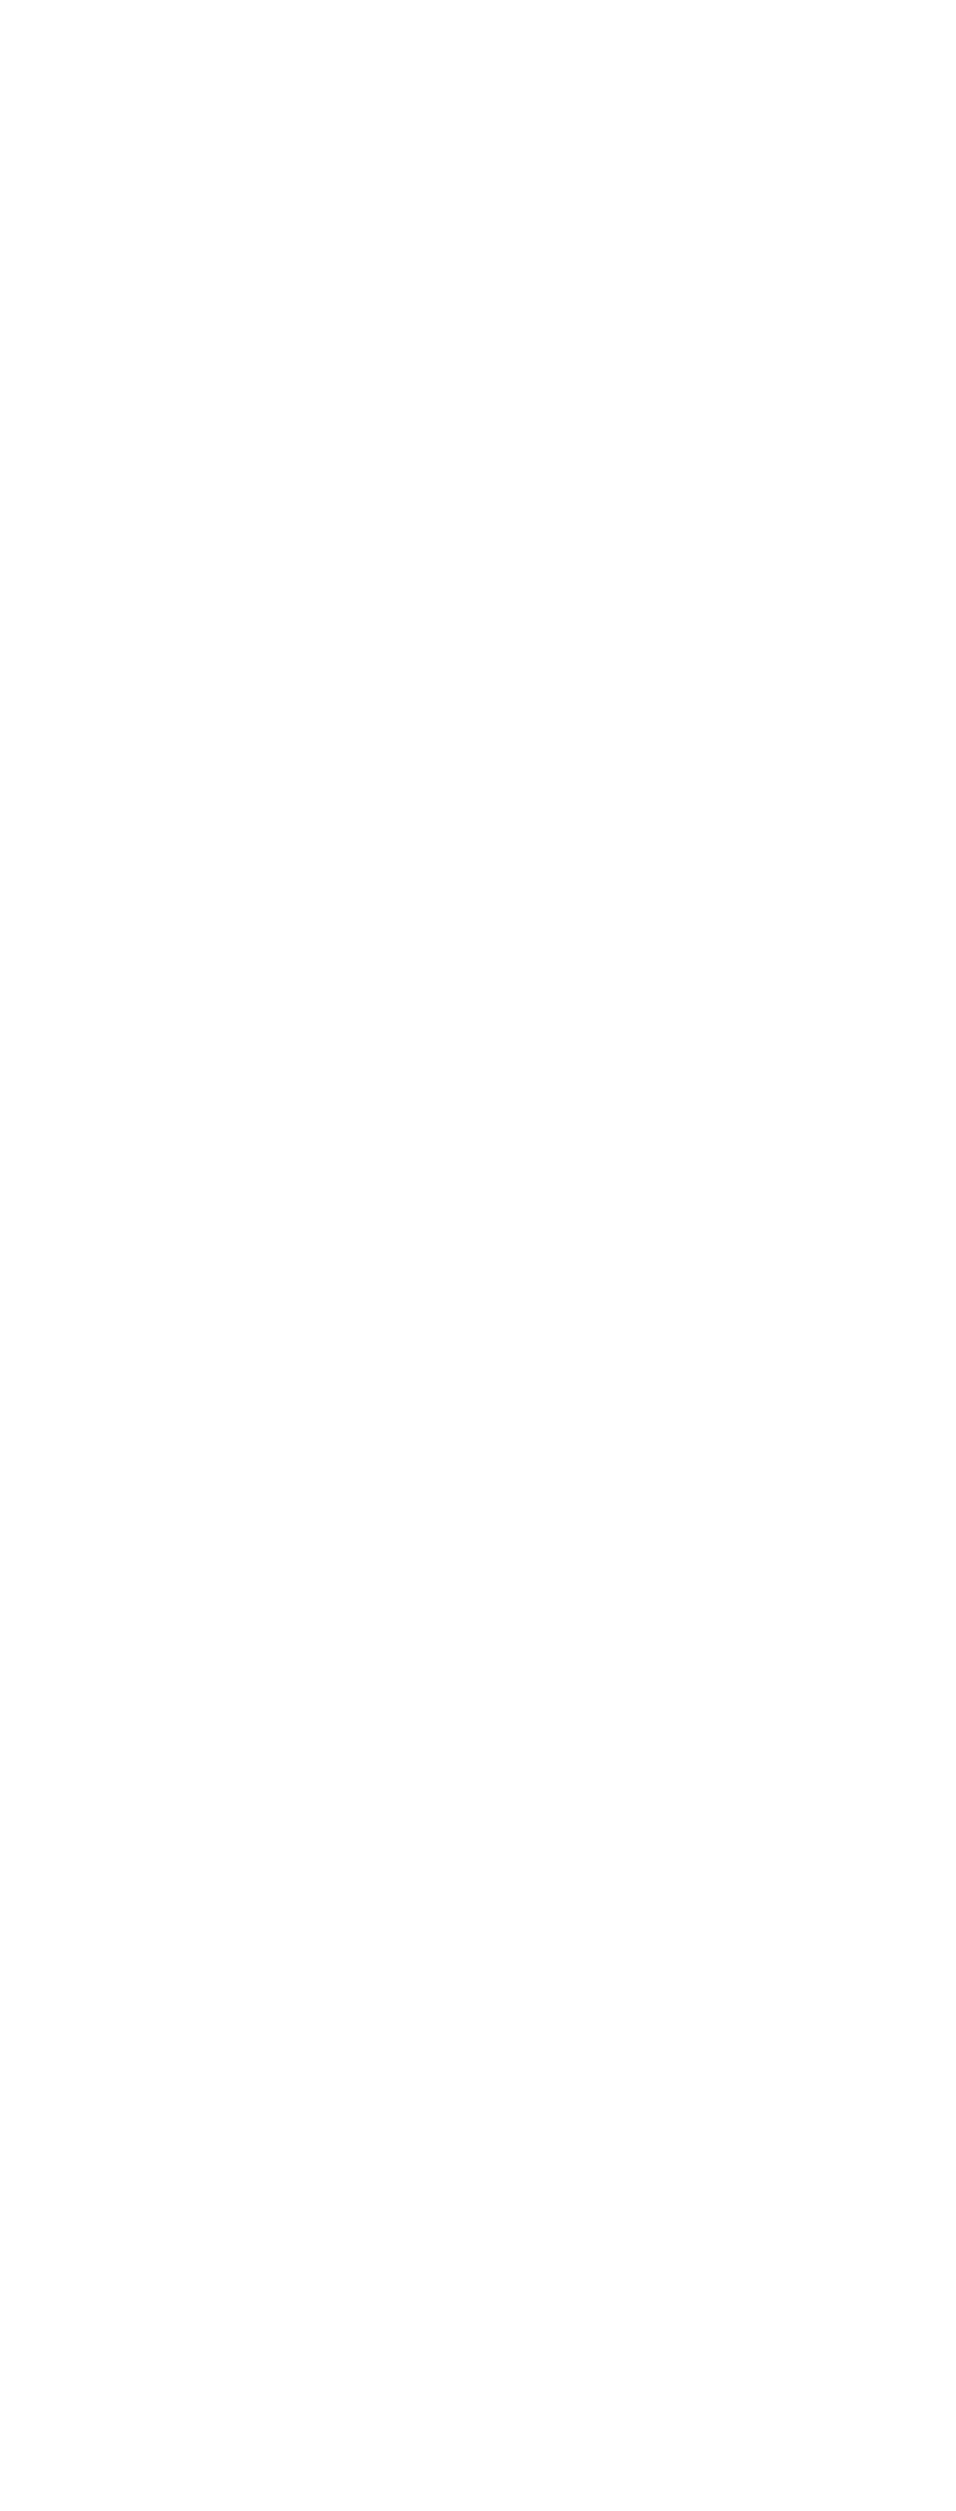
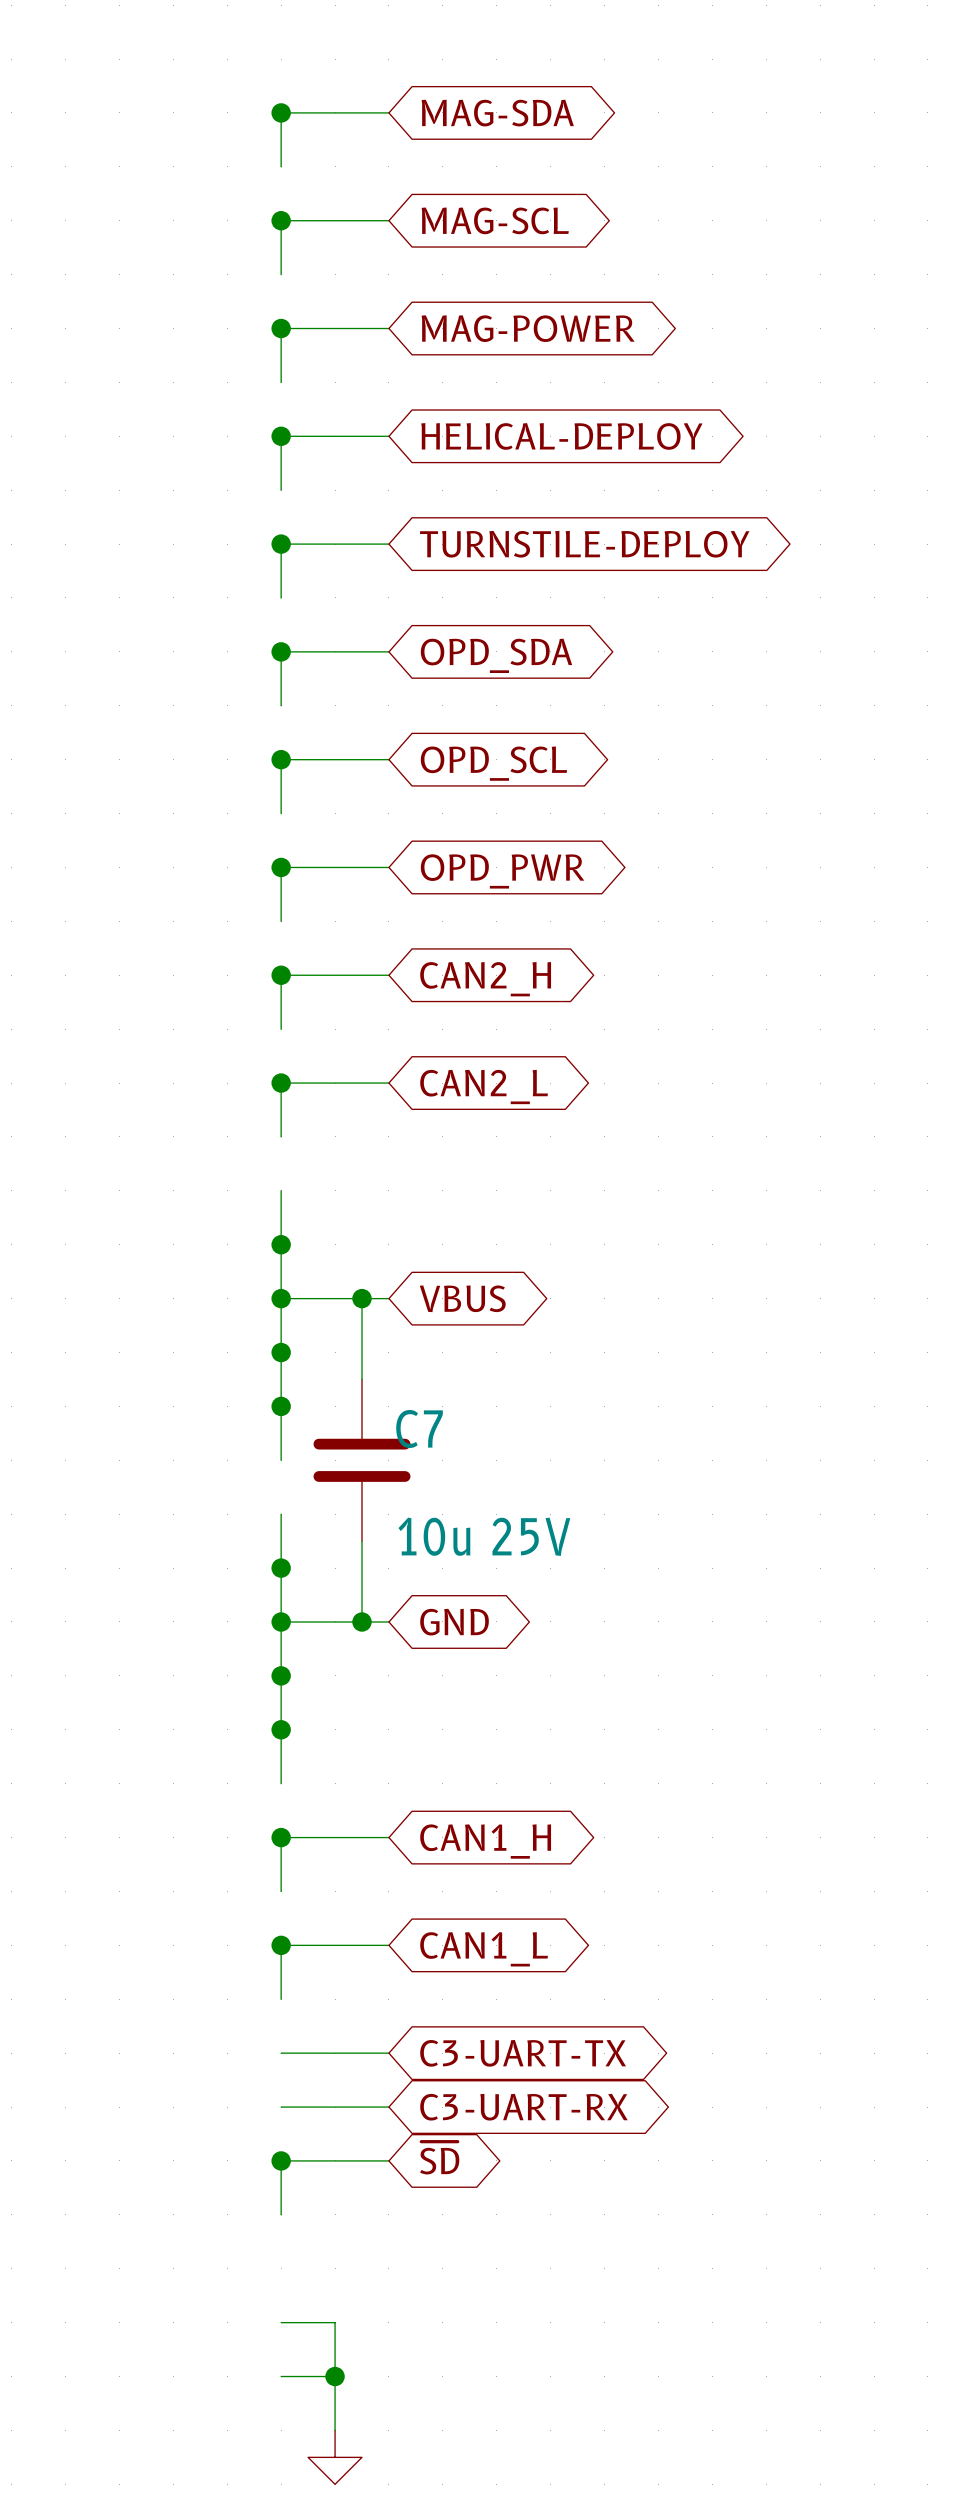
junction: none -> (281, 112)
wire: none -> (388, 112) (281, 112) (281, 166)
global label: none -> MAG-SDA (497, 113)
junction: none -> (281, 220)
wire: none -> (388, 220) (281, 220) (281, 274)
global label: none -> MAG-SCL (495, 220)
junction: none -> (281, 328)
wire: none -> (388, 328) (281, 328) (281, 382)
global label: none -> MAG-POWER (528, 328)
junction: none -> (281, 436)
wire: none -> (388, 436) (281, 436) (281, 490)
global label: none -> HELICAL-DEPLOY (561, 436)
junction: none -> (281, 544)
wire: none -> (388, 544) (281, 544) (281, 597)
global label: none -> TURNSTILE-DEPLOY (584, 544)
junction: none -> (281, 651)
wire: none -> (388, 651) (281, 651) (281, 705)
global label: none -> OPD_SDA (496, 655)
junction: none -> (281, 759)
wire: none -> (388, 759) (281, 759) (281, 813)
global label: none -> OPD_SCL (493, 763)
junction: none -> (281, 867)
wire: none -> (388, 867) (281, 867) (281, 921)
global label: none -> OPD_PWR (502, 871)
junction: none -> (281, 975)
wire: none -> (388, 975) (281, 975) (281, 1029)
global label: none -> CAN2_H (485, 979)
junction: none -> (281, 1083)
wire: none -> (388, 1083) (281, 1083) (281, 1136)
global label: none -> CAN2_L (484, 1086)
wire: none -> (281, 1190) (281, 1460)
junction: none -> (281, 1244)
wire: none -> (281, 1298) (388, 1298)
junction: none -> (281, 1298)
wire: none -> (362, 1298) (362, 1379)
junction: none -> (362, 1298)
global label: none -> VBUS (462, 1298)
junction: none -> (281, 1352)
junction: none -> (281, 1406)
C7: none -> 10u 25V (362, 1460)
wire: none -> (281, 1514) (281, 1783)
wire: none -> (362, 1541) (362, 1621)
junction: none -> (281, 1568)
wire: none -> (281, 1621) (388, 1621)
junction: none -> (281, 1621)
junction: none -> (362, 1621)
global label: none -> GND (454, 1622)
junction: none -> (281, 1675)
junction: none -> (281, 1729)
junction: none -> (281, 1837)
wire: none -> (388, 1837) (281, 1837) (281, 1891)
global label: none -> CAN1_H (485, 1841)
junction: none -> (281, 1945)
wire: none -> (388, 1945) (281, 1945) (281, 1999)
global label: none -> CAN1_L (484, 1949)
wire: none -> (281, 2053) (388, 2053)
global label: none -> C3-UART-TX (523, 2053)
wire: none -> (281, 2107) (388, 2107)
global label: none -> C3-UART-RX (523, 2107)
global label: none -> ~{SD} (439, 2158)
junction: none -> (281, 2160)
wire: none -> (388, 2160) (281, 2160) (281, 2214)
wire: none -> (281, 2322) (335, 2322) (335, 2430)
wire: none -> (281, 2376) (335, 2376)
junction: none -> (335, 2376)
power symbol: none -> (335, 2457)

